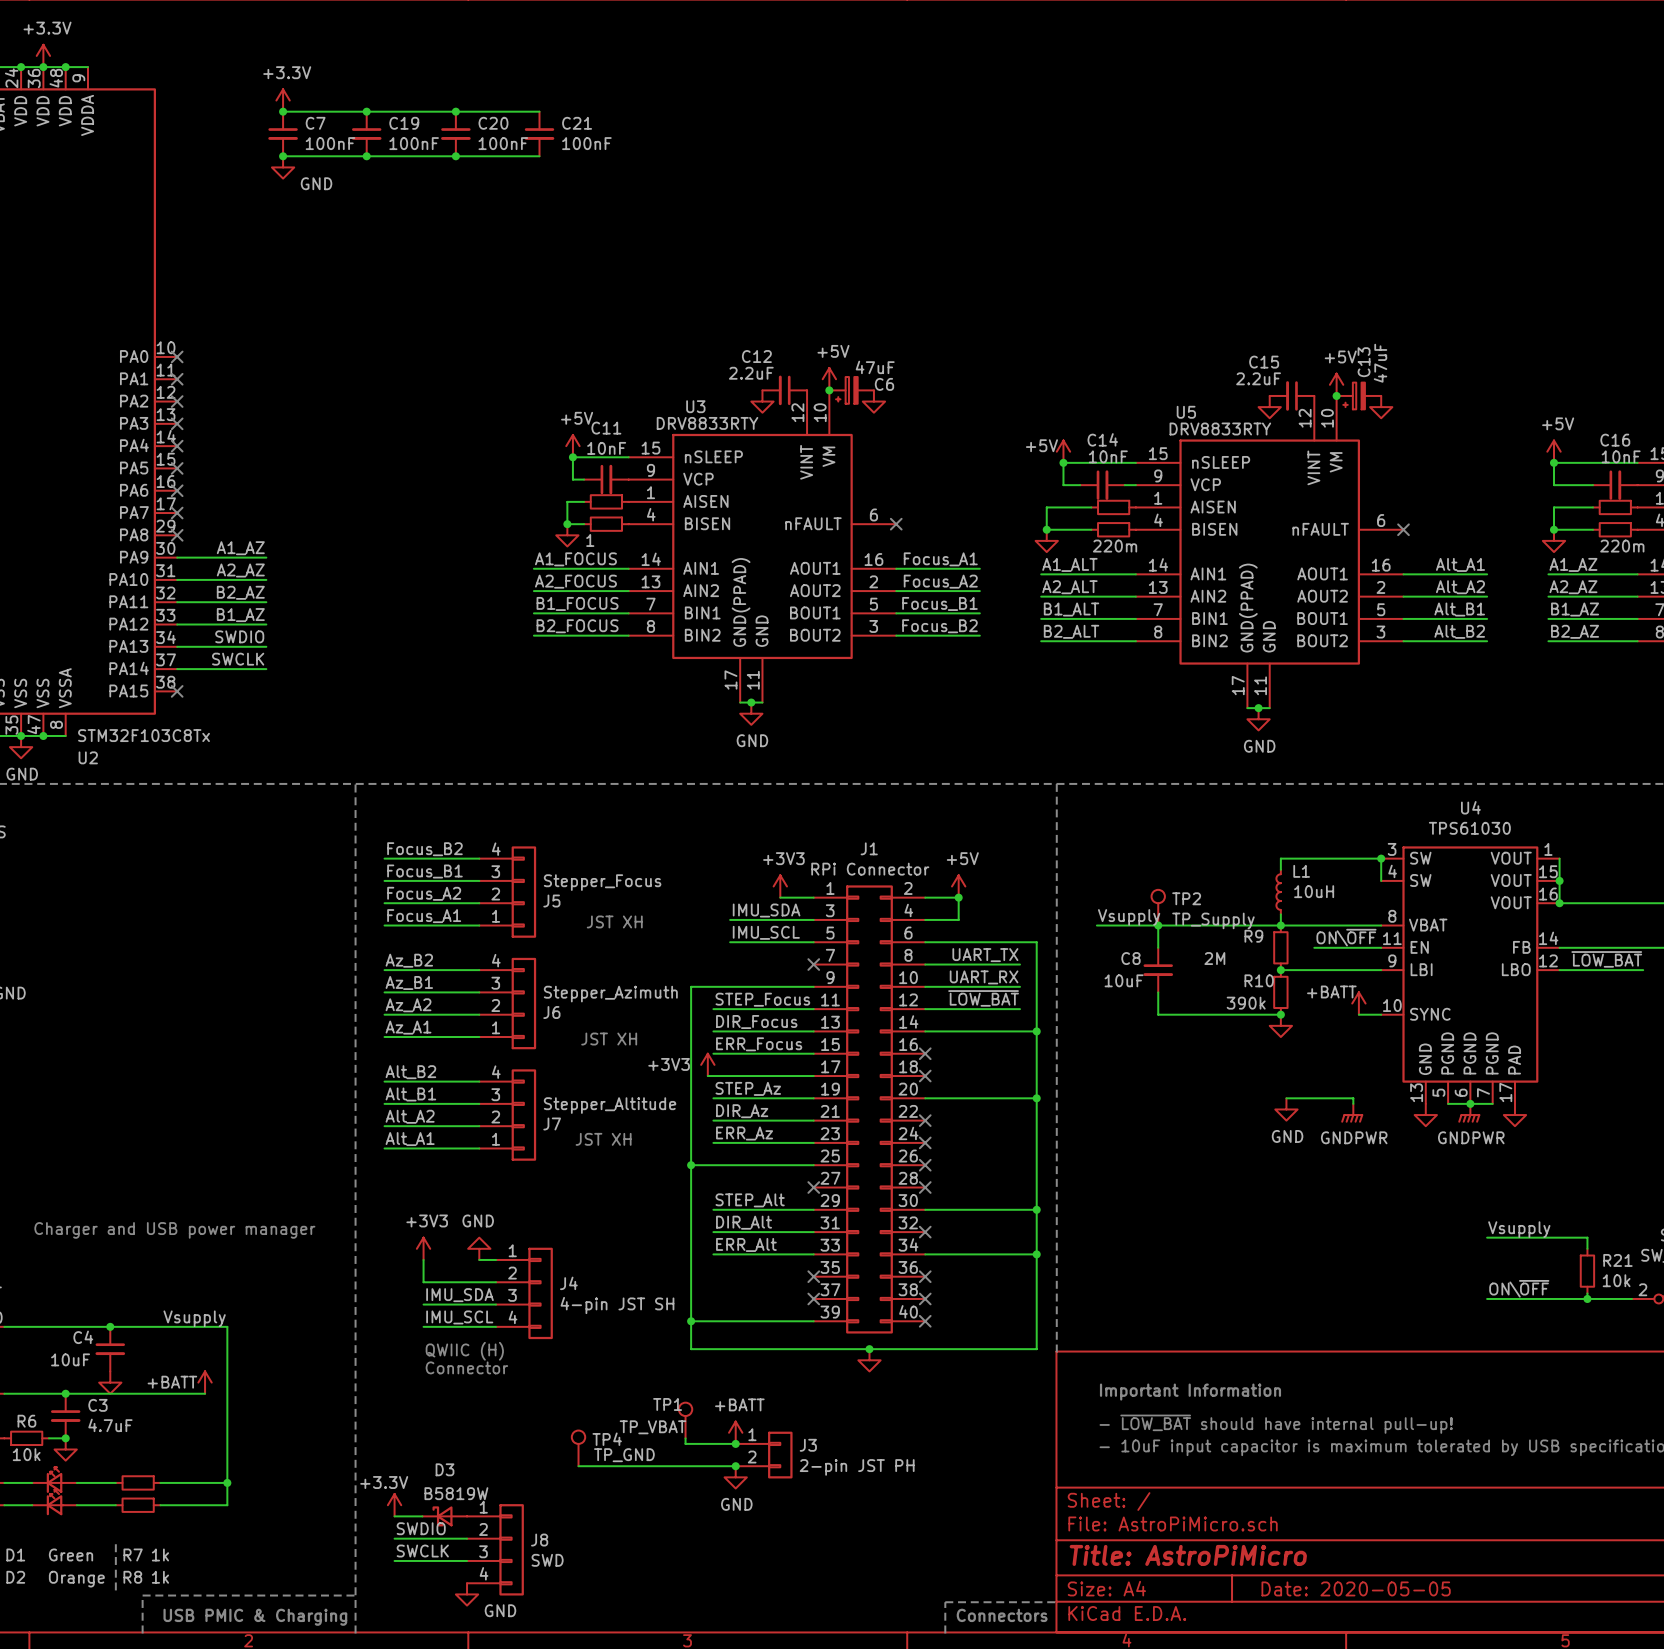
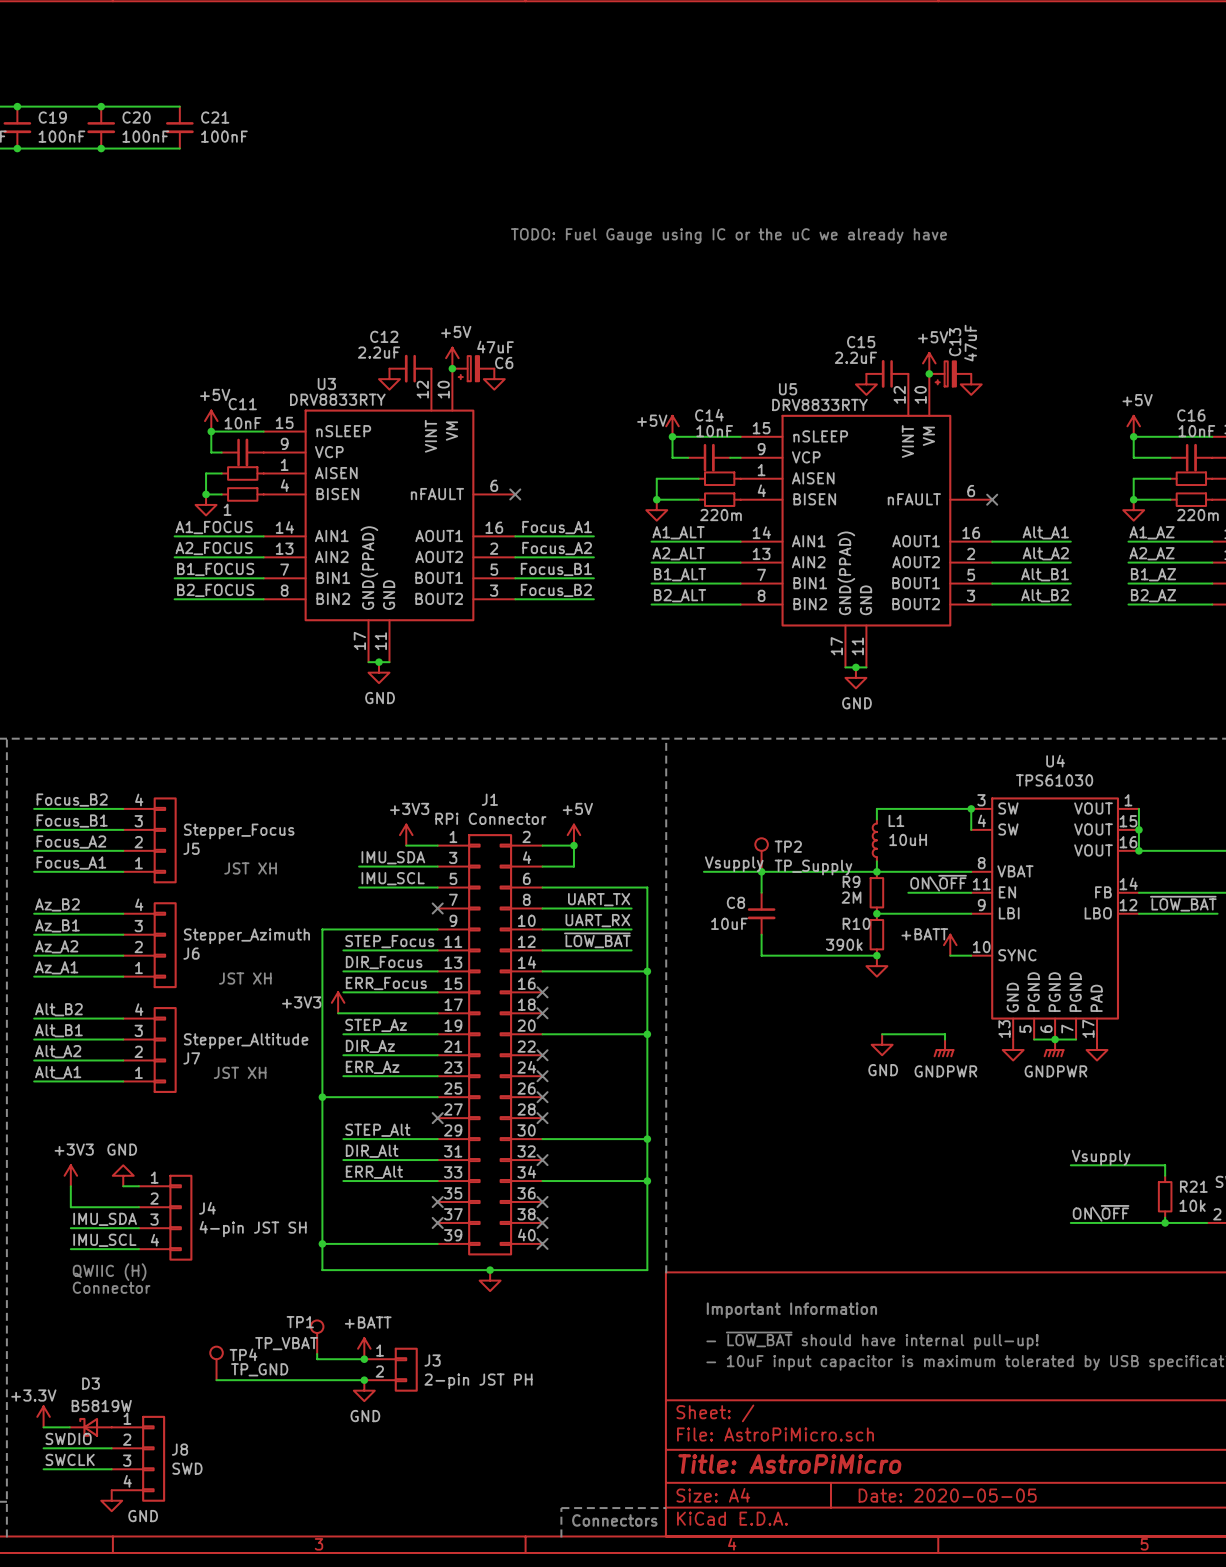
text: none -> TODO: Fuel Gauge using IC or the uC we already have (728, 236)
R9 value position: 2M (1214, 958) -> 2M (851, 897)

